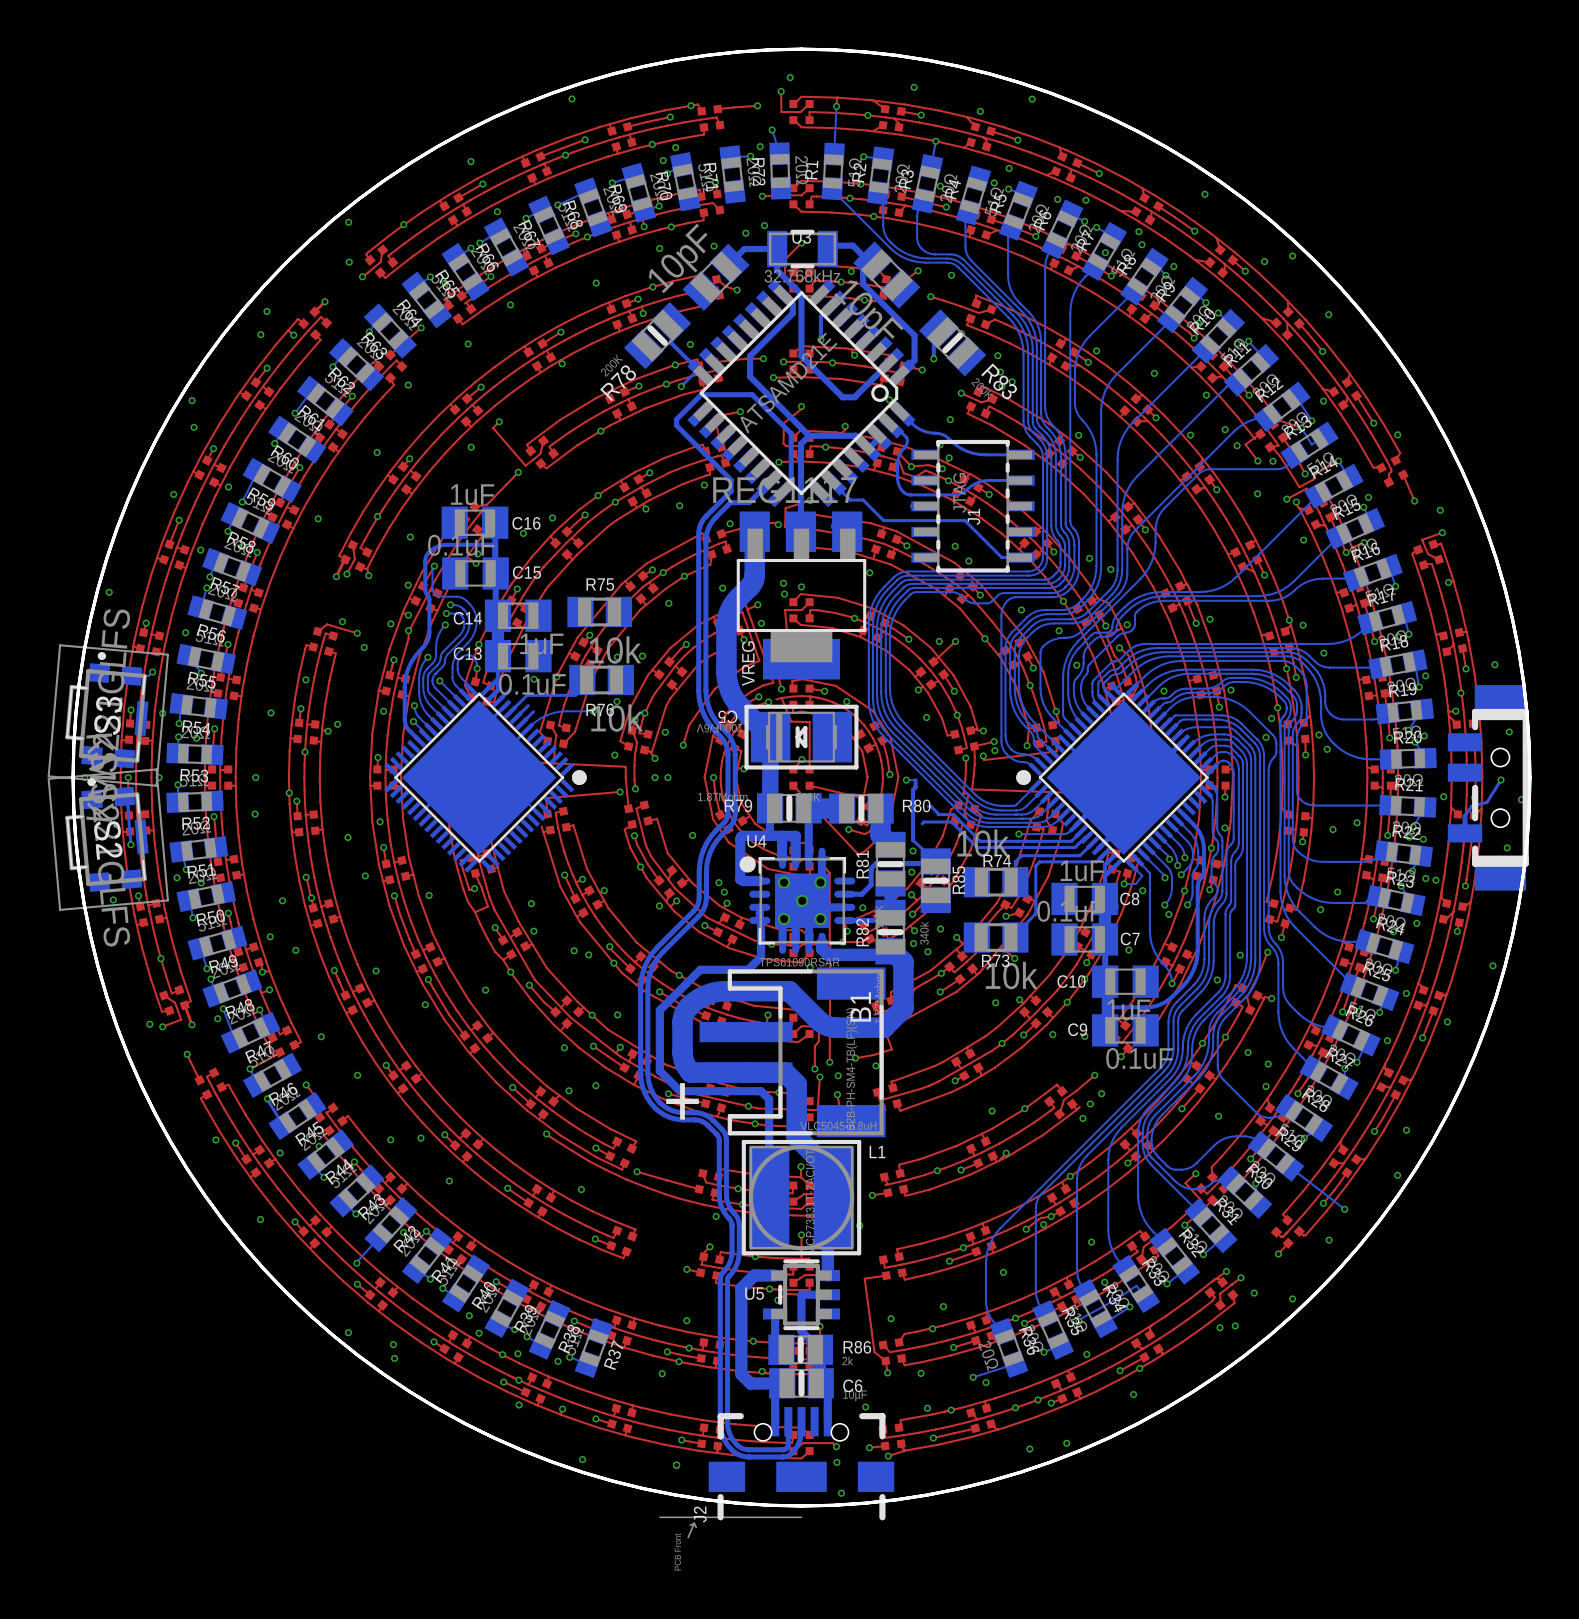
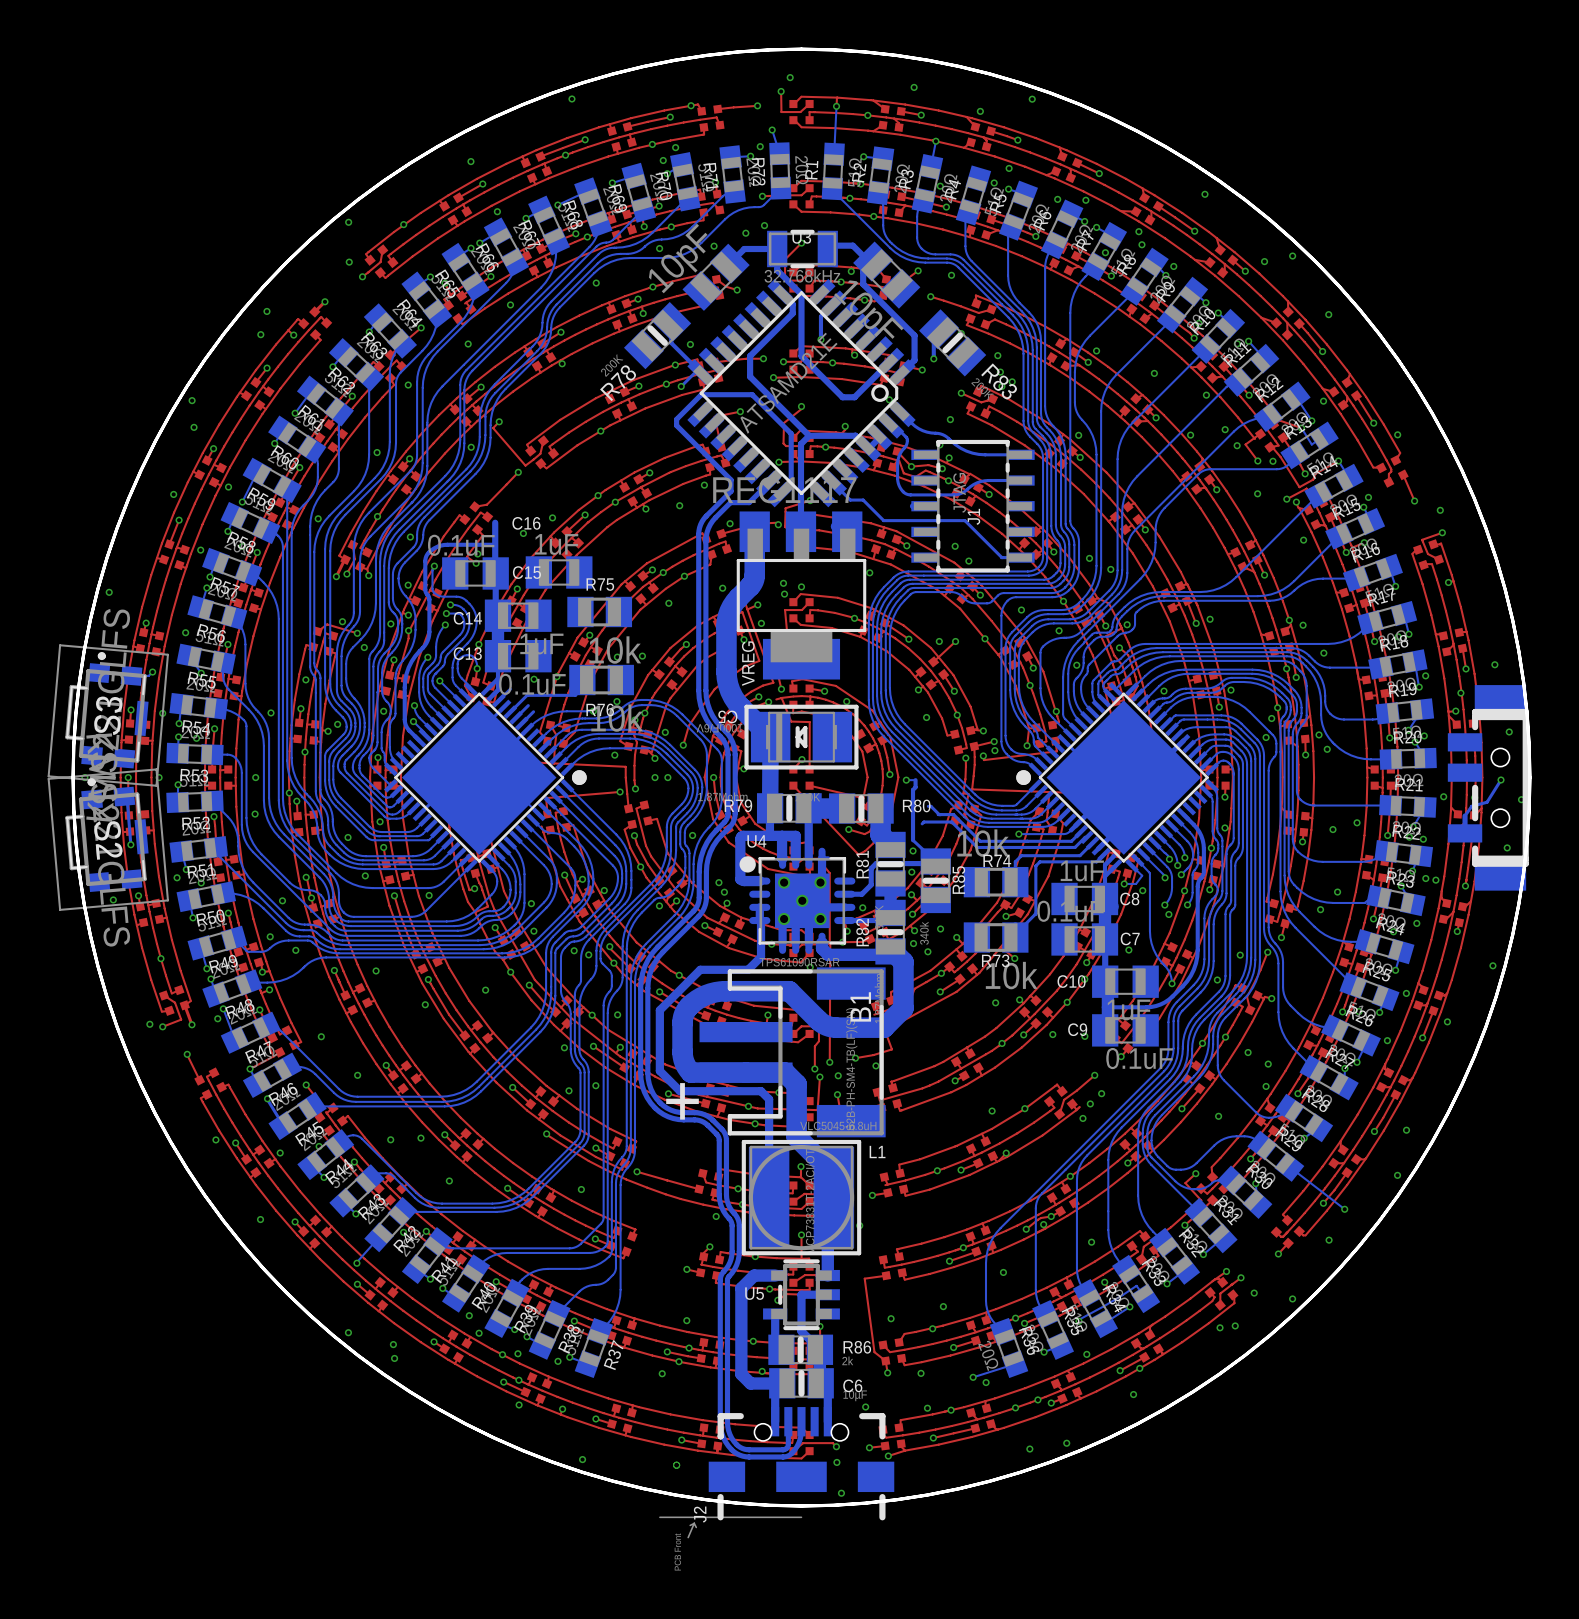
bottom track: none -> (780, 188) (762, 206) (743, 208) (729, 215) (696, 247) (684, 254) (671, 257) (623, 258) (610, 261) (599, 268) (557, 310) (552, 320) (549, 337) (543, 350) (497, 399) (491, 418) (488, 450) (483, 463) (427, 522) (420, 546) (403, 564) (399, 572) (400, 588) (414, 611) (415, 629) (412, 646) (398, 666) (395, 675) (395, 714) (389, 725) (389, 747) (391, 756) (396, 763)
bottom track: none -> (734, 191) (724, 195) (683, 233) (672, 238) (652, 241) (633, 253) (612, 254) (600, 260) (553, 307) (548, 319) (545, 336) (540, 347) (489, 400) (485, 412) (484, 441) (478, 460) (422, 519) (417, 528) (415, 544) (396, 564) (393, 570) (393, 600) (401, 616) (401, 632) (397, 645) (384, 663) (382, 672) (382, 694) (390, 710) (382, 727) (381, 748) (385, 762) (390, 769)
bottom track: none -> (688, 198) (641, 240) (629, 245) (608, 248) (600, 252) (548, 304) (543, 315) (539, 335) (535, 343) (494, 384) (483, 400) (480, 413) (479, 442) (473, 459) (395, 542) (389, 561) (388, 602) (390, 609) (397, 619) (397, 631) (394, 642) (382, 655) (378, 663) (377, 742) (373, 750)
bottom track: none -> (643, 209) (612, 240) (596, 246) (470, 373) (464, 386) (464, 443) (460, 462) (453, 474) (399, 529) (388, 546) (384, 566) (384, 642) (373, 663) (373, 738) (370, 747) (360, 760) (359, 768) (361, 774) (384, 796) (390, 797) (396, 791)
bottom track: none -> (599, 223) (596, 236) (589, 246) (464, 372) (460, 382) (460, 439) (456, 459) (445, 476) (390, 531) (383, 542) (380, 562) (379, 636) (369, 657) (368, 734) (364, 747) (354, 761) (352, 768) (356, 775) (387, 806) (393, 806) (402, 797)
bottom track: none -> (556, 241) (554, 264) (545, 282) (442, 386) (431, 403) (427, 415) (425, 479) (416, 497) (386, 528) (379, 540) (376, 553) (374, 616) (369, 628) (351, 649) (346, 657) (346, 682) (354, 698)
bottom track: none -> (514, 262) (512, 273) (508, 280) (437, 351) (426, 368) (422, 387) (420, 476) (412, 494) (370, 536) (362, 547) (360, 561) (359, 617) (347, 635) (341, 650) (342, 690) (356, 709) (360, 726) (356, 740) (339, 758) (338, 769) (386, 817) (401, 818) (413, 808)
bottom track: none -> (475, 286) (473, 299) (468, 312) (425, 358) (418, 371) (415, 463) (410, 471) (368, 512) (357, 529) (353, 549) (353, 614) (351, 621) (342, 633) (337, 648) (337, 693) (352, 713) (355, 726) (352, 737) (337, 753) (334, 760) (333, 782) (336, 792) (369, 826) (377, 831) (410, 831) (425, 820)
bottom track: none -> (437, 313) (435, 327) (430, 340) (399, 374) (396, 379) (396, 442) (392, 462) (380, 479) (340, 519) (334, 531) (330, 544) (330, 687) (334, 698) (348, 715) (351, 725) (347, 736) (330, 755) (329, 784) (333, 795) (338, 802) (368, 832) (380, 836)
bottom track: none -> (402, 343) (393, 357) (390, 367) (389, 441) (385, 461) (374, 478) (335, 517) (328, 529) (325, 542) (325, 689) (330, 702) (343, 717)
bottom track: none -> (369, 376) (367, 468) (358, 486) (324, 520) (318, 532) (314, 545) (314, 663) (320, 678) (320, 791) (330, 808) (336, 837) (346, 847) (355, 854) (366, 856) (416, 855) (428, 850) (442, 837)
bottom track: none -> (338, 411) (338, 473) (317, 500) (311, 513) (310, 526) (310, 666) (315, 680) (316, 796) (326, 812) (331, 839) (344, 852) (352, 858) (362, 860) (425, 860) (433, 857) (448, 843)
bottom track: none -> (311, 449) (317, 461) (316, 485) (310, 497) (296, 513) (291, 533) (291, 757) (295, 777) (319, 811) (326, 841) (337, 854) (349, 861) (362, 864) (434, 864) (440, 862) (453, 848)
bottom track: none -> (287, 488) (287, 767) (294, 786) (314, 813) (319, 841) (334, 858) (345, 865) (358, 868) (436, 868) (446, 865) (459, 854)
C16 position: (474, 522) -> (559, 572)
bottom track: none -> (266, 530) (276, 534) (282, 545) (282, 798) (284, 811) (289, 824) (336, 873) (346, 881) (359, 886) (372, 888) (434, 887) (441, 883) (465, 860)
bottom track: none -> (248, 573) (257, 576) (268, 587) (274, 599) (278, 612) (278, 800) (280, 813) (289, 831) (335, 879) (342, 910) (347, 914) (354, 916) (419, 915) (470, 865)
bottom track: none -> (233, 617) (240, 625) (245, 639) (246, 693) (250, 702) (264, 719) (268, 733) (269, 797) (272, 817) (284, 834) (326, 877) (332, 888) (335, 909) (341, 918) (348, 921) (446, 921) (463, 918) (477, 908) (495, 888) (496, 876) (487, 865)
bottom track: none -> (223, 662) (223, 678) (225, 685) (253, 714) (262, 732) (263, 800) (267, 820) (278, 836) (322, 880) (328, 892) (330, 913) (337, 921) (350, 926) (454, 926) (466, 923) (483, 912) (500, 909) (508, 899) (510, 889) (508, 878) (493, 860)
bottom track: none -> (354, 698) (363, 714) (364, 731) (359, 744) (345, 761) (345, 771) (388, 813) (397, 813) (408, 802)
bottom track: none -> (215, 708) (230, 711) (243, 719)
bottom track: none -> (342, 717) (346, 723) (345, 731) (325, 755) (325, 785) (332, 802) (371, 839) (428, 840) (436, 831)
bottom track: none -> (243, 720) (246, 726) (246, 817) (250, 837) (261, 854) (292, 884) (301, 889) (315, 891) (320, 895) (324, 901) (328, 918) (338, 928) (346, 930) (461, 930) (472, 926) (485, 916) (500, 914) (509, 907) (514, 900) (515, 881) (512, 870) (498, 854)
bottom track: none -> (538, 740) (551, 729) (562, 722) (575, 718) (606, 717) (631, 701) (653, 700) (666, 703) (677, 710) (717, 749) (721, 758) (720, 808) (716, 818) (700, 838) (695, 850) (693, 888) (689, 901) (678, 917) (645, 951) (636, 969) (634, 982) (634, 1153) (620, 1181) (620, 1296) (613, 1315) (599, 1331)
bottom track: none -> (544, 746) (558, 733) (569, 727) (582, 723) (608, 721) (632, 706) (650, 705) (665, 707) (677, 716) (702, 741) (706, 755) (705, 799) (700, 810) (684, 831) (685, 843) (689, 853) (689, 885) (685, 898) (674, 915) (641, 949) (634, 960) (631, 973) (630, 1147) (629, 1157) (619, 1170) (616, 1180) (615, 1270) (604, 1282) (581, 1289) (556, 1314)
bottom track: none -> (375, 749) (369, 755) (370, 763) (390, 785)
bottom track: none -> (550, 752) (568, 734) (576, 730) (633, 729) (647, 731) (659, 736) (670, 744) (697, 772) (702, 784) (699, 803) (680, 828) (680, 844) (685, 856) (683, 877) (669, 894) (655, 898) (641, 912) (633, 923) (628, 935) (626, 948) (626, 1146) (622, 1157)
bottom track: none -> (212, 754) (231, 755) (240, 764) (242, 829) (249, 848) (329, 928) (340, 935) (464, 935) (473, 932) (488, 921) (506, 917) (518, 903) (520, 884) (516, 866) (504, 848)
bottom track: none -> (556, 757) (571, 743) (587, 735) (638, 734) (651, 737) (662, 744) (691, 772) (696, 782) (697, 792) (694, 801) (676, 825) (675, 857) (672, 870) (665, 881) (633, 915) (626, 926) (623, 939) (622, 979) (617, 990)
bottom track: none -> (561, 763) (581, 744) (591, 739) (636, 738) (649, 742) (661, 749) (688, 776) (692, 785) (689, 802) (671, 824) (670, 856) (664, 874) (608, 932) (601, 944) (600, 960) (610, 971) (611, 976) (611, 987) (605, 998) (603, 1005) (603, 1219) (581, 1243) (571, 1248) (453, 1248) (444, 1246) (437, 1242)
bottom track: none -> (567, 769) (584, 755) (596, 750) (650, 748) (658, 752) (684, 777) (688, 788) (685, 799) (670, 815) (667, 822) (666, 853) (659, 872) (600, 935) (596, 946) (595, 970) (580, 996) (579, 1051) (587, 1065) (588, 1072) (587, 1140) (532, 1196) (516, 1208) (496, 1211) (402, 1211)
bottom track: none -> (567, 785) (620, 839) (629, 857) (631, 870) (631, 890) (628, 899) (586, 942) (581, 955) (580, 981) (574, 993) (574, 1048) (576, 1057) (584, 1070) (584, 1132) (582, 1140) (525, 1197) (514, 1203) (501, 1207) (429, 1206) (418, 1200) (391, 1174) (374, 1173)
bottom track: none -> (561, 791) (618, 848) (624, 861) (626, 871) (625, 891) (620, 902) (584, 938) (569, 943) (561, 955) (561, 992) (570, 1011) (570, 1052) (580, 1071) (580, 1129) (578, 1138) (523, 1193) (505, 1201) (492, 1203) (442, 1203) (428, 1200) (416, 1192) (359, 1136) (348, 1136) (339, 1143)
bottom track: none -> (556, 797) (616, 858) (621, 867) (622, 878) (619, 892) (611, 903) (581, 933) (568, 937) (556, 949) (554, 1002) (551, 1015) (544, 1027) (481, 1091) (464, 1102) (444, 1106) (311, 1106)
bottom track: none -> (212, 801) (233, 824) (237, 837) (239, 859) (245, 871) (253, 882) (293, 921) (318, 926) (333, 938) (340, 940) (478, 940) (491, 938) (503, 933) (518, 921) (524, 906) (523, 863) (518, 853) (510, 843)
bottom track: none -> (550, 802) (612, 865) (618, 877) (615, 889) (609, 898) (580, 927) (566, 932) (553, 945) (549, 1006) (544, 1018) (536, 1029) (473, 1091) (462, 1097) (449, 1101) (347, 1100) (337, 1095) (310, 1070) (301, 1067) (287, 1066)
bottom track: none -> (544, 808) (586, 852) (592, 871) (592, 890) (585, 904) (547, 944) (545, 997) (539, 1016) (531, 1027) (471, 1086) (460, 1092) (447, 1096) (350, 1095) (338, 1089) (279, 1030) (266, 1025)
bottom track: none -> (533, 820) (544, 830) (562, 835) (574, 846) (584, 862) (588, 881) (587, 889) (582, 901) (530, 950) (518, 955) (504, 957) (322, 957) (311, 961) (293, 975) (280, 980) (248, 982)
bottom track: none -> (430, 825) (418, 836) (377, 836)
bottom track: none -> (527, 825) (572, 869) (574, 875) (575, 885) (572, 900) (567, 908) (538, 938) (521, 949) (502, 953) (338, 953) (324, 950) (309, 940) (288, 940) (278, 942) (264, 951) (249, 951) (234, 938)
bottom track: none -> (521, 831) (553, 864) (556, 873) (555, 891) (549, 904) (520, 934) (509, 942) (496, 947) (483, 949) (335, 948) (323, 944) (311, 936) (290, 933) (253, 900) (240, 895) (223, 893)
bottom track: none -> (516, 837) (548, 870) (551, 880) (550, 890) (544, 902) (511, 934) (499, 941) (480, 945) (346, 945) (330, 941) (314, 930) (297, 929) (288, 925) (219, 856) (215, 847)
bottom track: none -> (616, 990) (610, 1001) (607, 1013) (606, 1244) (600, 1249) (592, 1252) (502, 1253) (488, 1257) (475, 1269)
bottom track: none -> (622, 1157) (614, 1168) (612, 1177) (611, 1250) (610, 1255) (600, 1263) (590, 1267) (543, 1269) (533, 1271) (518, 1283) (515, 1293)

